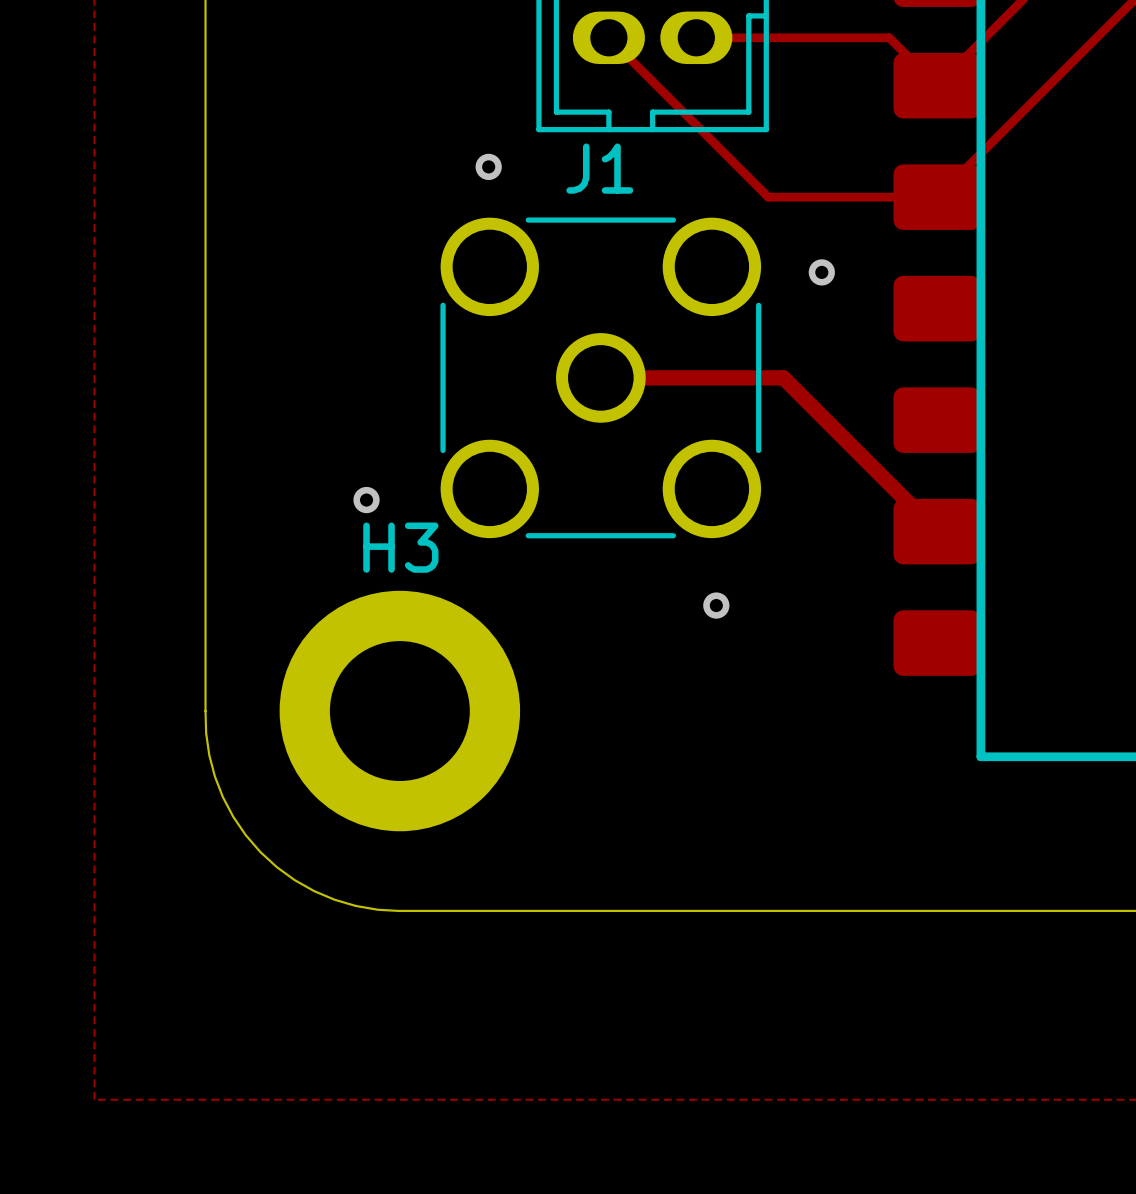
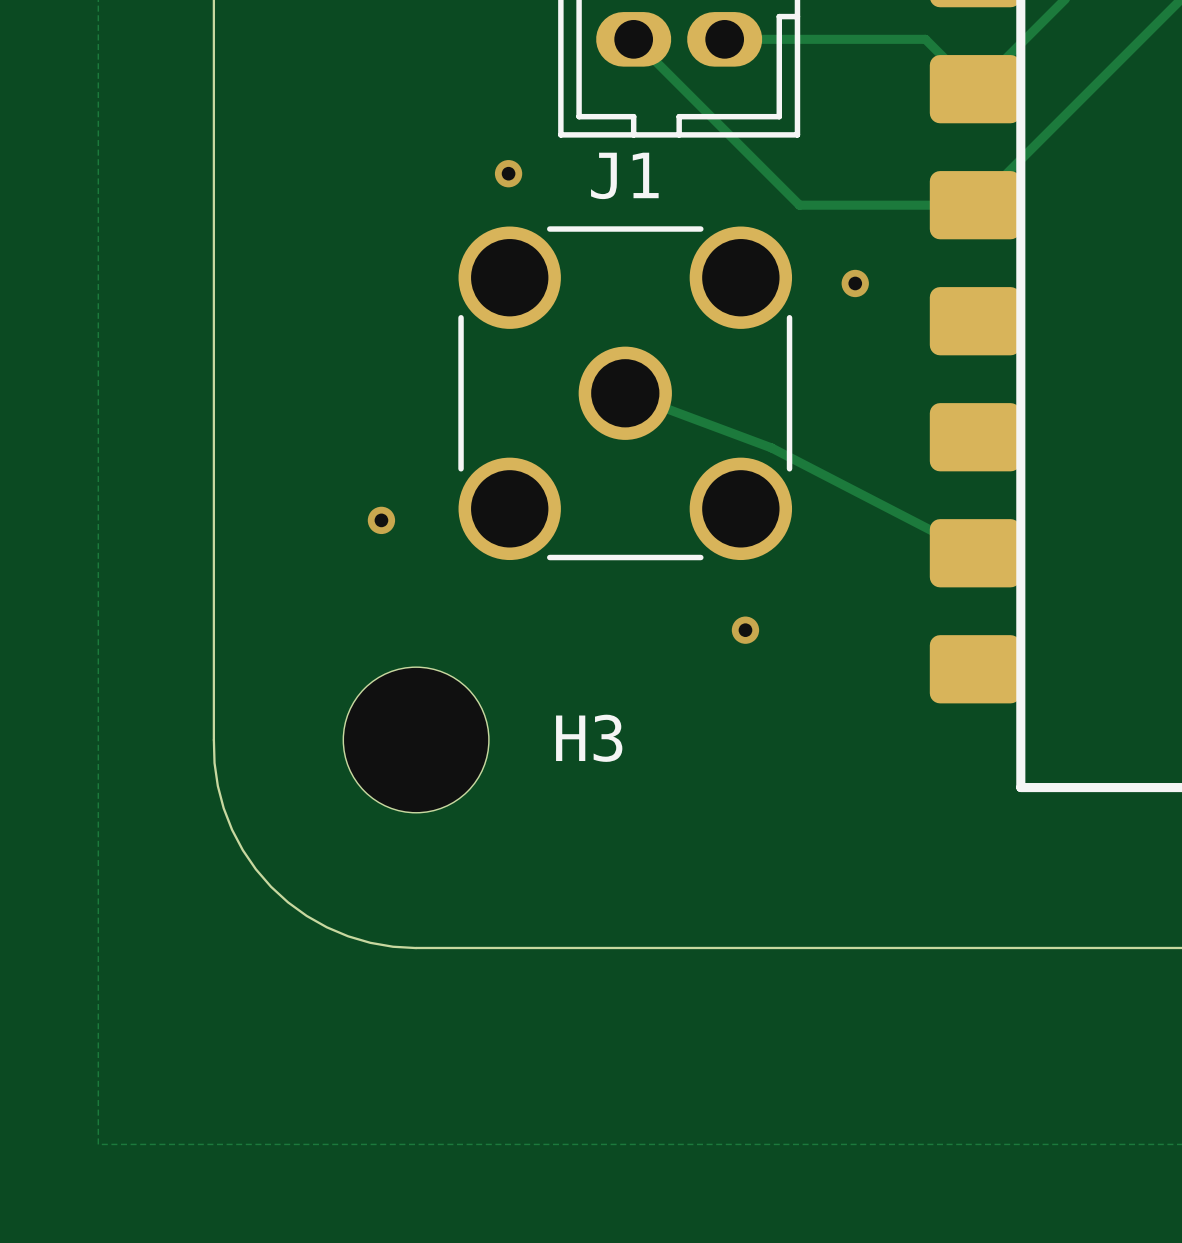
track: (600, 377) (783, 377) (937, 531) -> (625, 393) (771, 447) (975, 553)
H3 name position: H3 (400, 547) -> H3 (589, 738)
H3 footprint: [279, 590, 521, 832] -> [343, 667, 489, 813]

